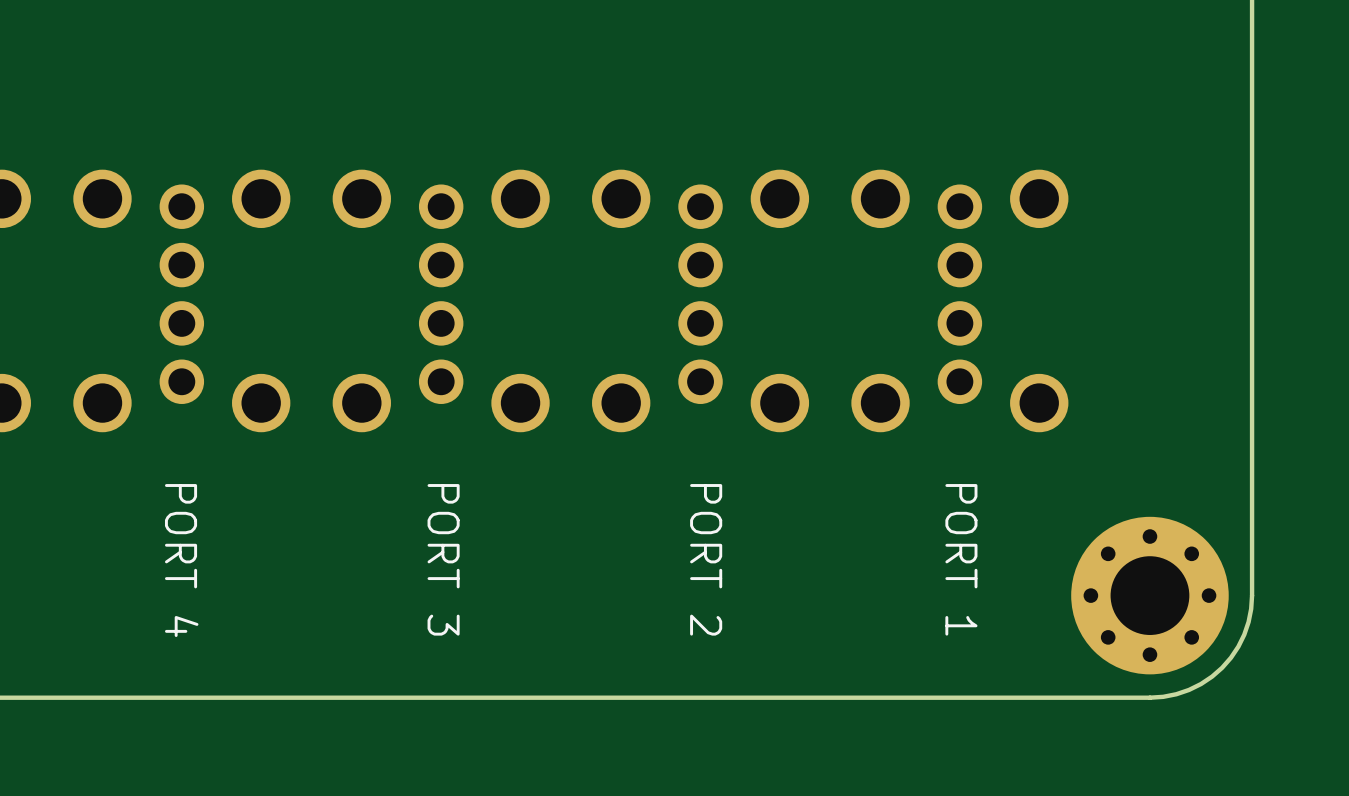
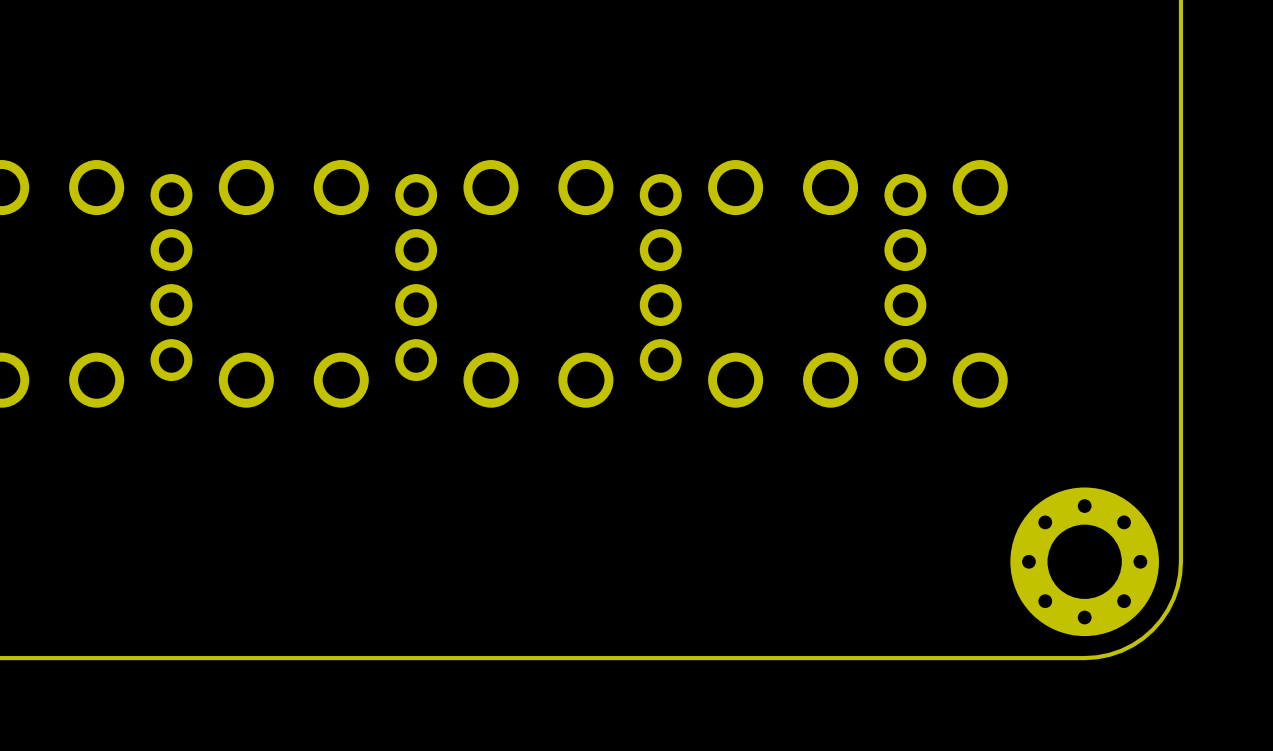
text: PORT 3 (443, 559) -> none
text: PORT 2 (706, 559) -> none
text: PORT 1 (961, 559) -> none
text: PORT 4 (181, 560) -> none

